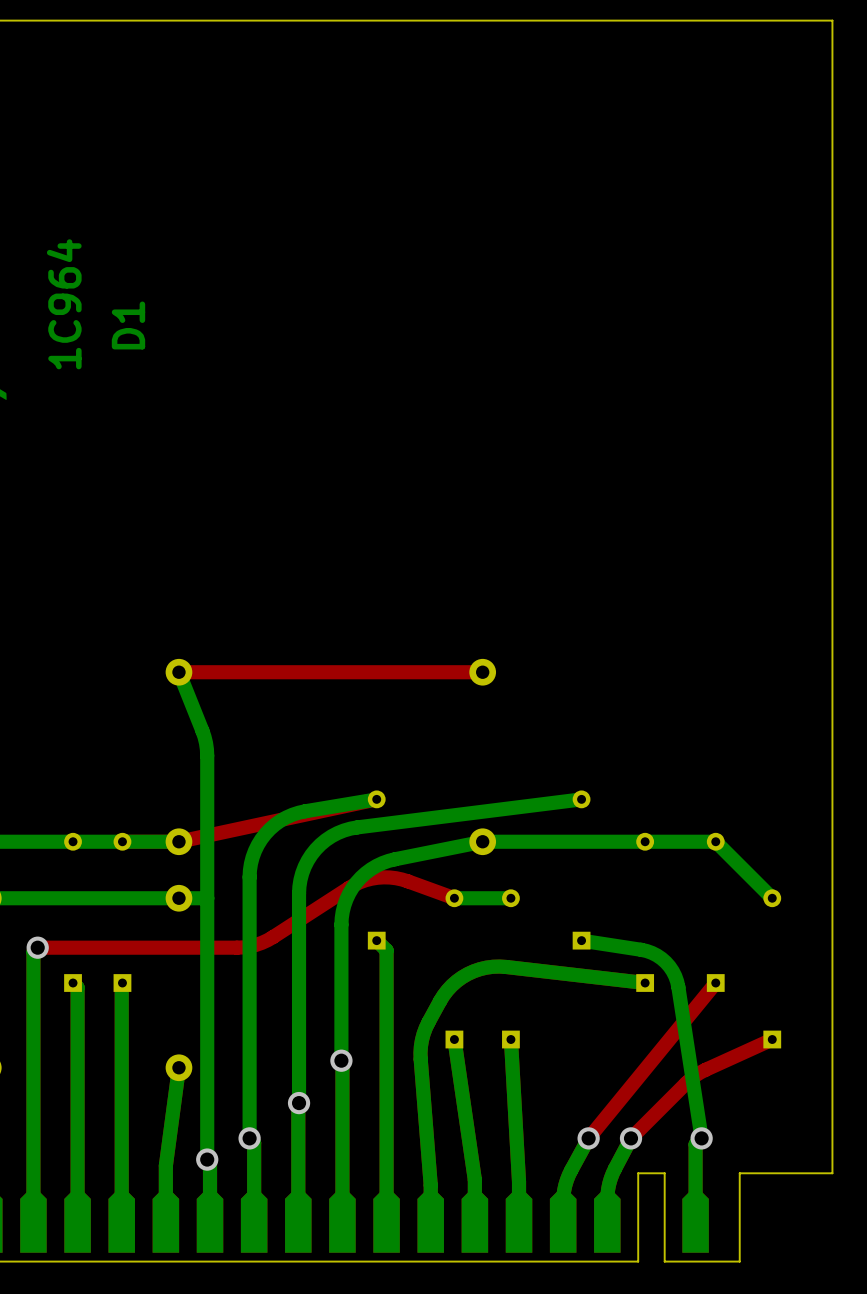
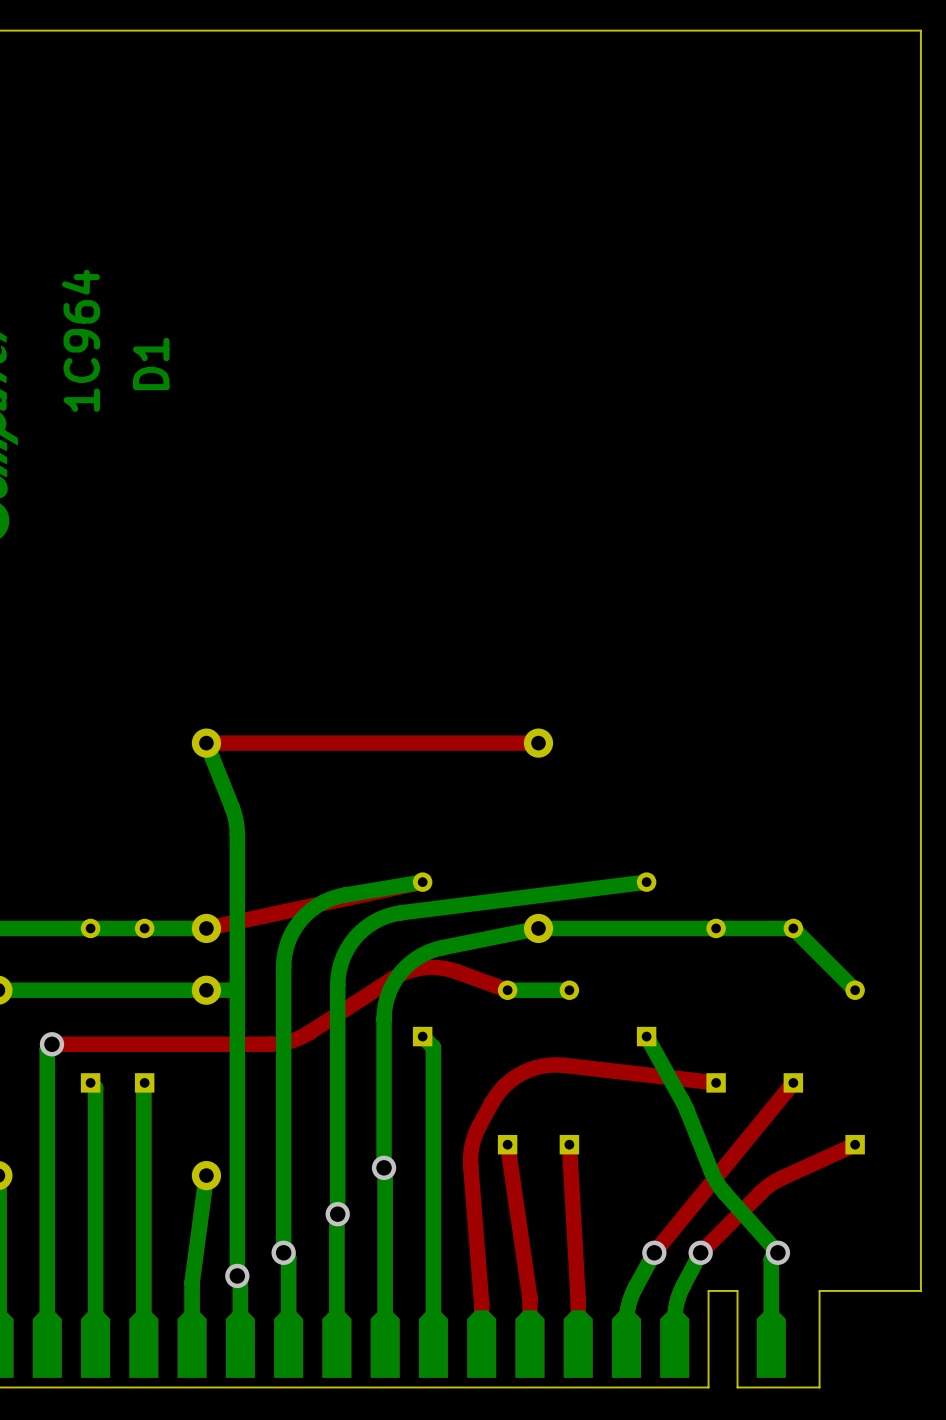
bottom track: (581, 940) (646, 951) (661, 958) (672, 971) (678, 987) (701, 1138) -> (646, 1036) (685, 1106) (717, 1182) (777, 1252)
bottom track: (645, 983) (493, 966) (467, 974) (447, 990) (425, 1027) (420, 1046) (430, 1185) (430, 1221) -> none
bottom track: (454, 1039) (474, 1180) (474, 1221) -> none
bottom track: (510, 1039) (519, 1181) (519, 1221) -> none

